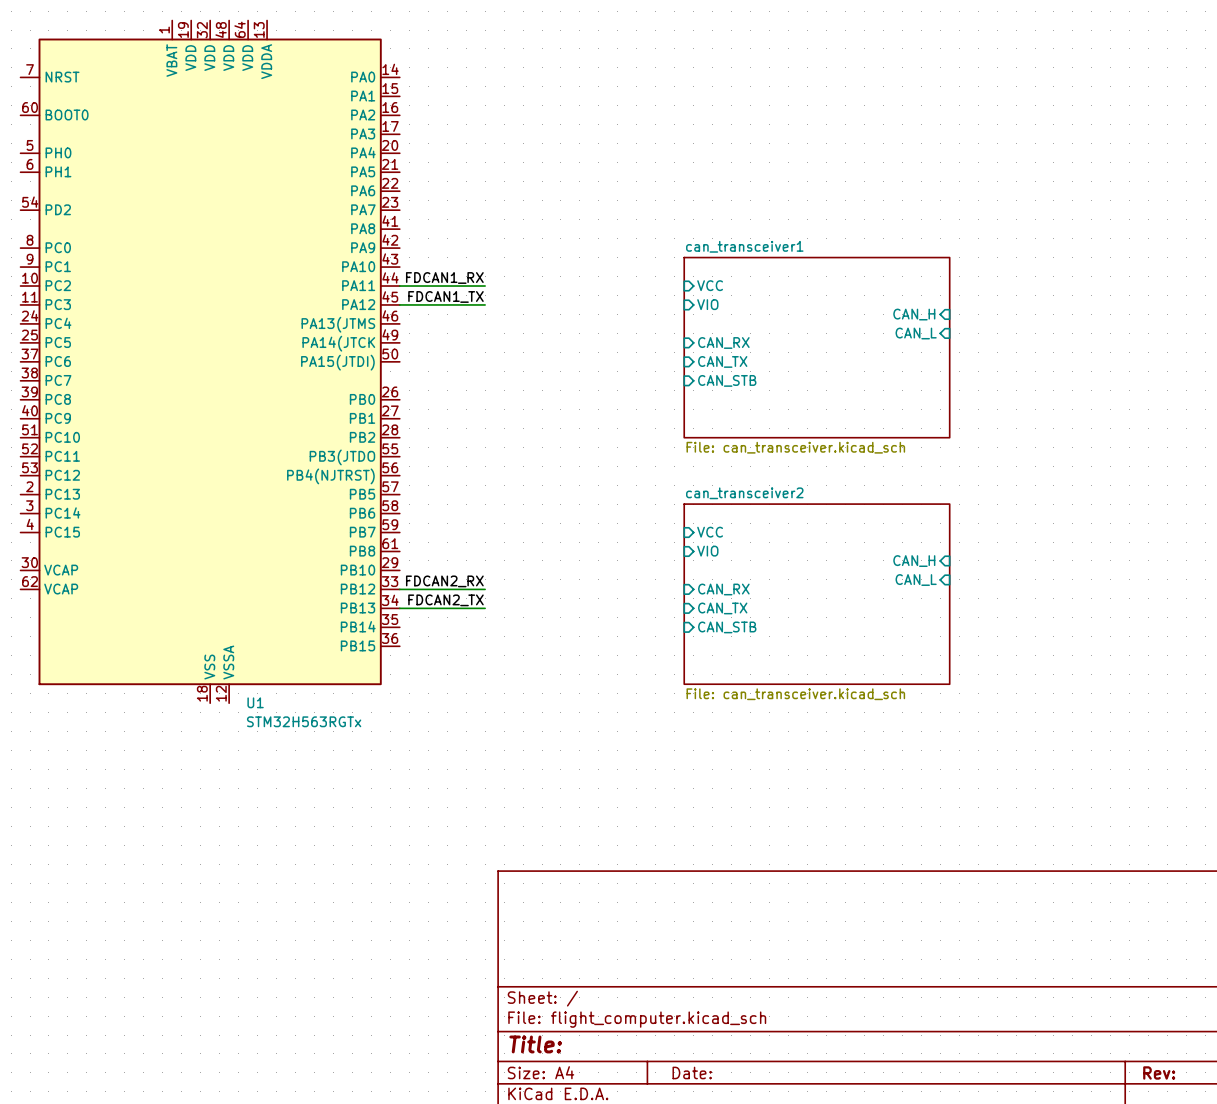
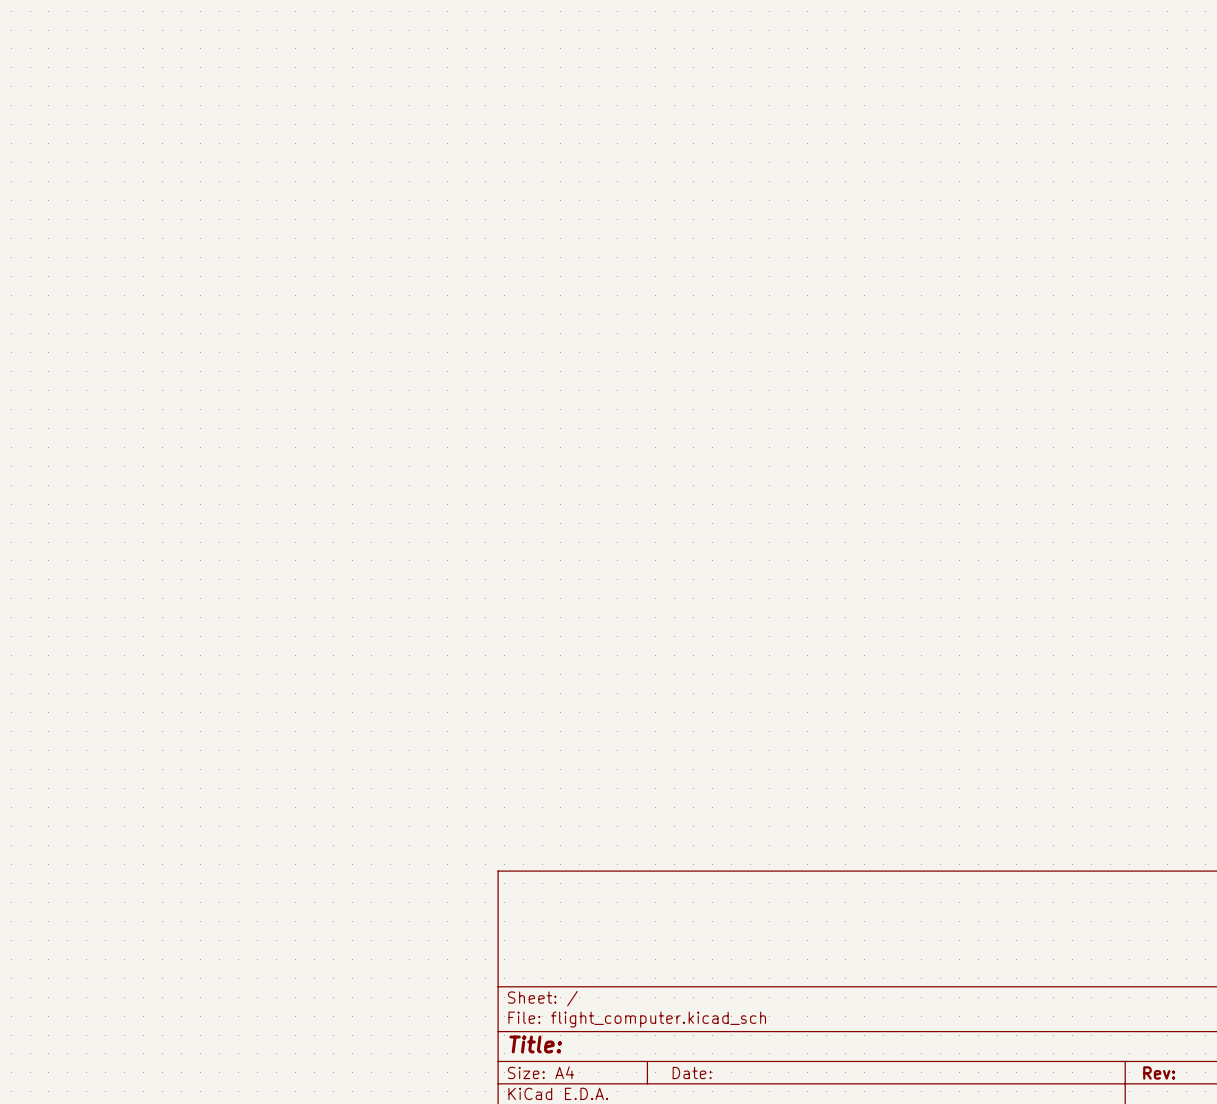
label: FDCAN1_RX (444, 278) -> none
sheet pin: VCC (710, 285) -> none
wire: (399, 286) (485, 286) -> none
label: FDCAN1_TX (445, 296) -> none
wire: (399, 304) (485, 304) -> none
sheet pin: VIO (707, 304) -> none
sheet pin: CAN_H (914, 314) -> none
sheet pin: CAN_L (916, 333) -> none
sheet pin: CAN_RX (723, 342) -> none
sheet can_transceiver1: File: can_transceiver.kicad_sch (816, 347) -> none
U1: STM32H563RGTx (210, 361) -> none
sheet pin: CAN_TX (722, 361) -> none
sheet pin: CAN_STB (727, 380) -> none
sheet pin: VCC (710, 532) -> none
sheet pin: VIO (707, 551) -> none
sheet pin: CAN_H (914, 561) -> none
sheet pin: CAN_L (916, 580) -> none
label: FDCAN2_RX (444, 581) -> none
wire: (399, 589) (485, 589) -> none
sheet pin: CAN_RX (723, 589) -> none
sheet can_transceiver2: File: can_transceiver.kicad_sch (816, 594) -> none
label: FDCAN2_TX (445, 600) -> none
wire: (399, 608) (485, 608) -> none
sheet pin: CAN_TX (722, 608) -> none
sheet pin: CAN_STB (727, 627) -> none

